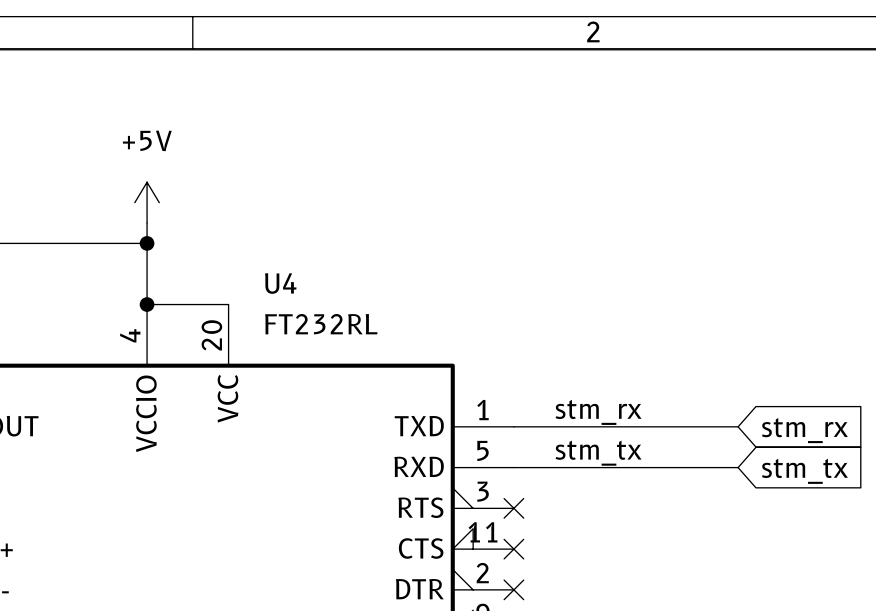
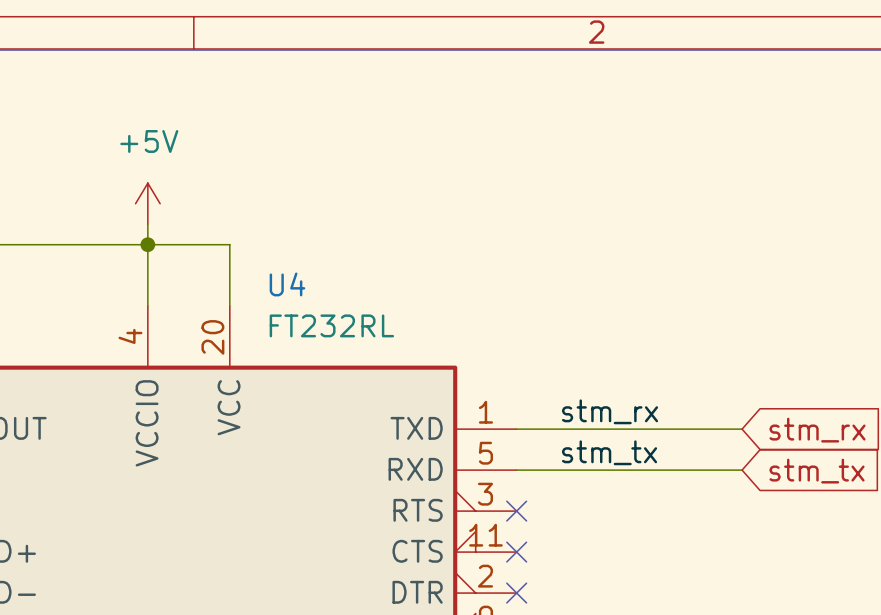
wire: (147, 304) (228, 304) -> (147, 244) (229, 244) (229, 306)
junction: (147, 304) -> none

